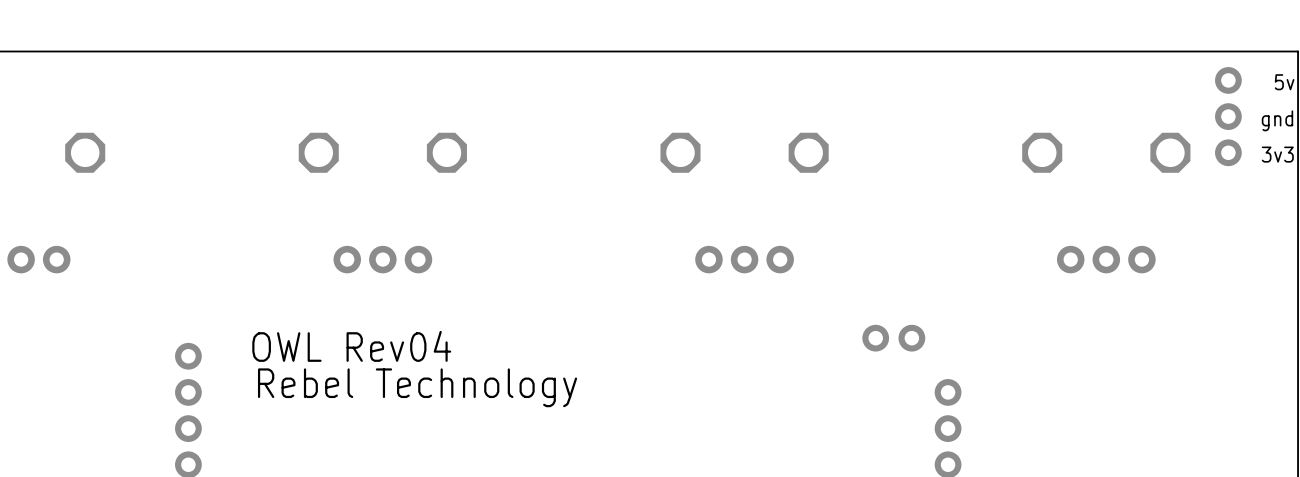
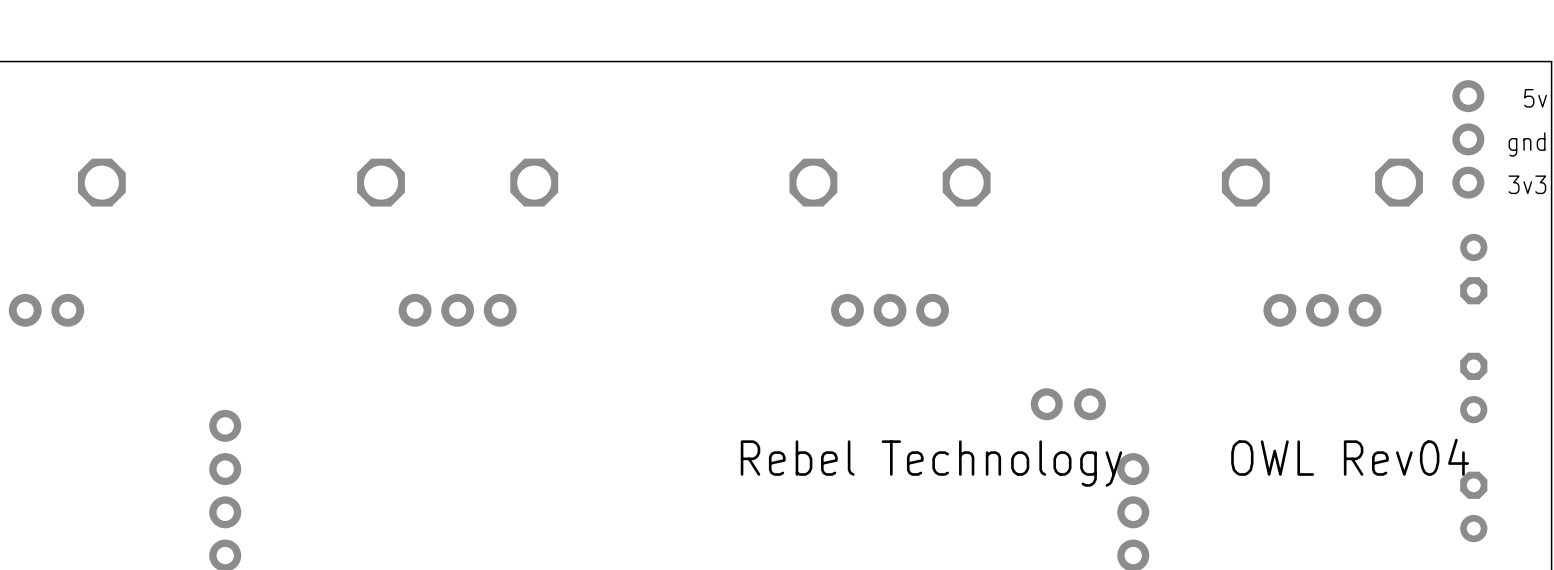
part: none -> (1473, 269)
part: none -> (1473, 388)
text: OWL Rev04 (351, 346) -> none
text: none -> OWL Rev04 (1350, 457)
text: Rebel Technology (417, 387) -> none
text: none -> Rebel Technology (931, 463)
part: none -> (1473, 506)

